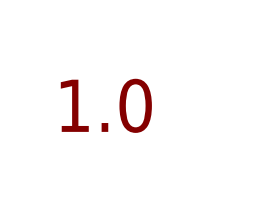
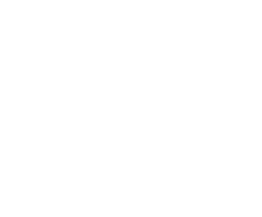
text: 1.0 (106, 105) -> none

